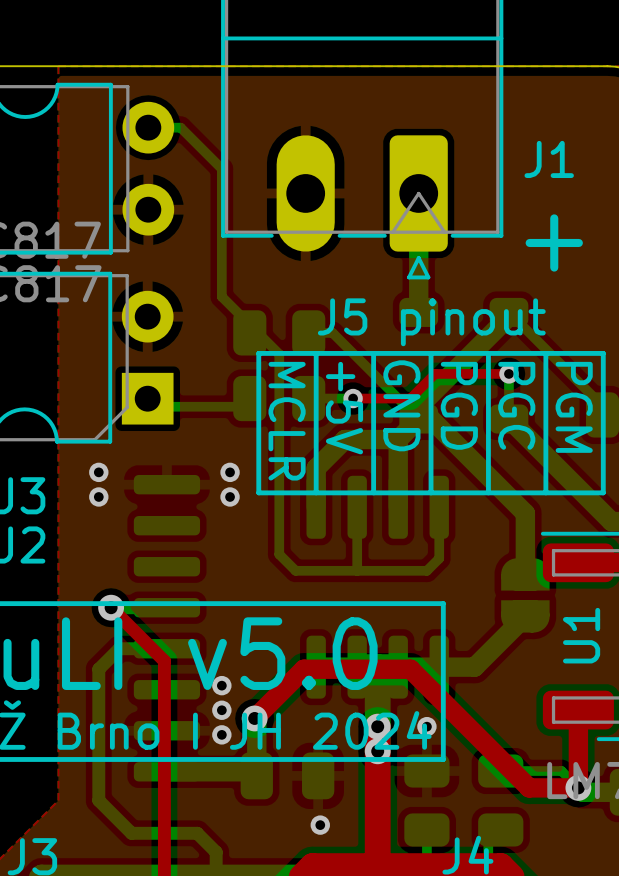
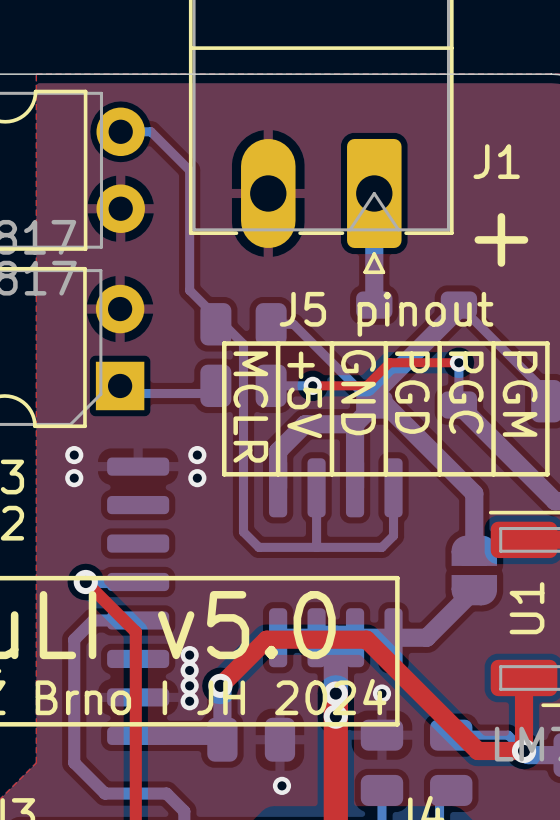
via: none -> (189, 670)
via: (221, 710) -> none
via: none -> (189, 685)

